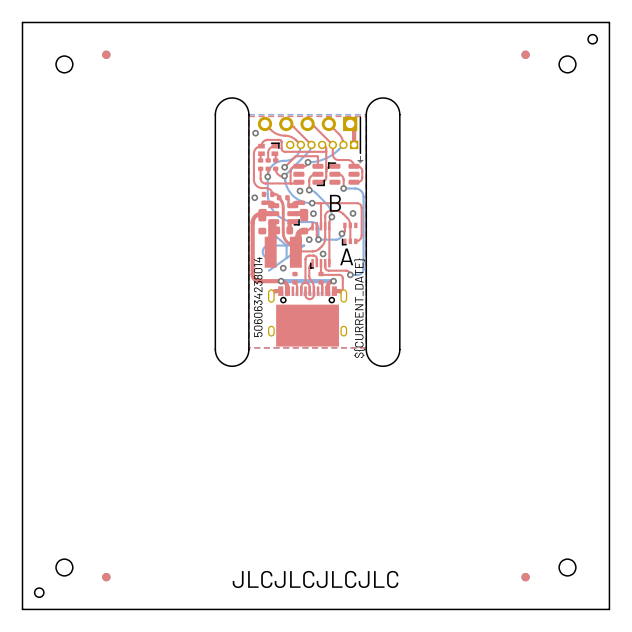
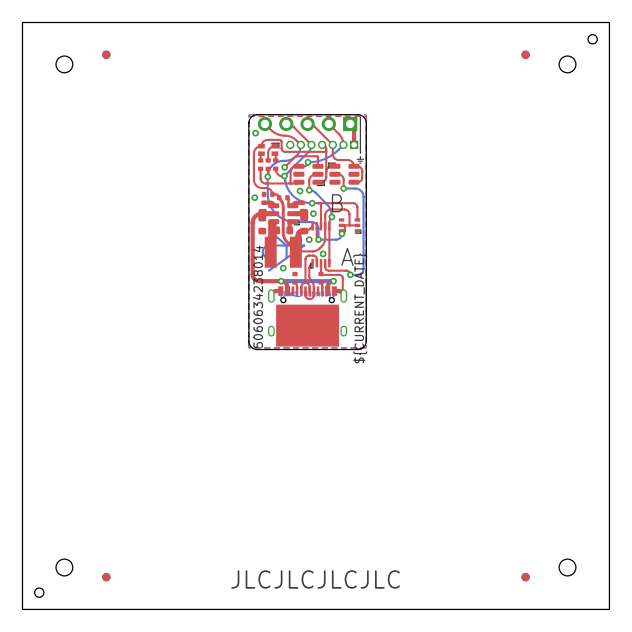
board edge: (248, 123) (247, 108) (240, 100) (227, 98) (217, 106) (215, 114) (215, 349) (217, 357) (227, 365) (240, 364) (247, 355) (248, 341) -> (248, 123) (251, 117) (257, 114) (358, 114) (364, 117) (366, 123)
board edge: (366, 123) (367, 108) (374, 100) (387, 98) (397, 106) (399, 114) (399, 349) (397, 357) (387, 365) (374, 364) (367, 355) (366, 341) -> (248, 341) (251, 347) (257, 349) (358, 349) (363, 347) (366, 341)
top track: (353, 203) (359, 203) (361, 207) (361, 236) (355, 241) -> (353, 203) (357, 206) (357, 219)
via: (353, 213) -> none
top track: (325, 217) (326, 213) (329, 210) (338, 211) (343, 213) (349, 222) (350, 241) -> (325, 217) (325, 212) (329, 209) (346, 209) (349, 213) (349, 225)
top track: none -> (341, 225) (357, 225)
part rotation: 0° (349, 233) -> 90° counterclockwise (350, 225)

